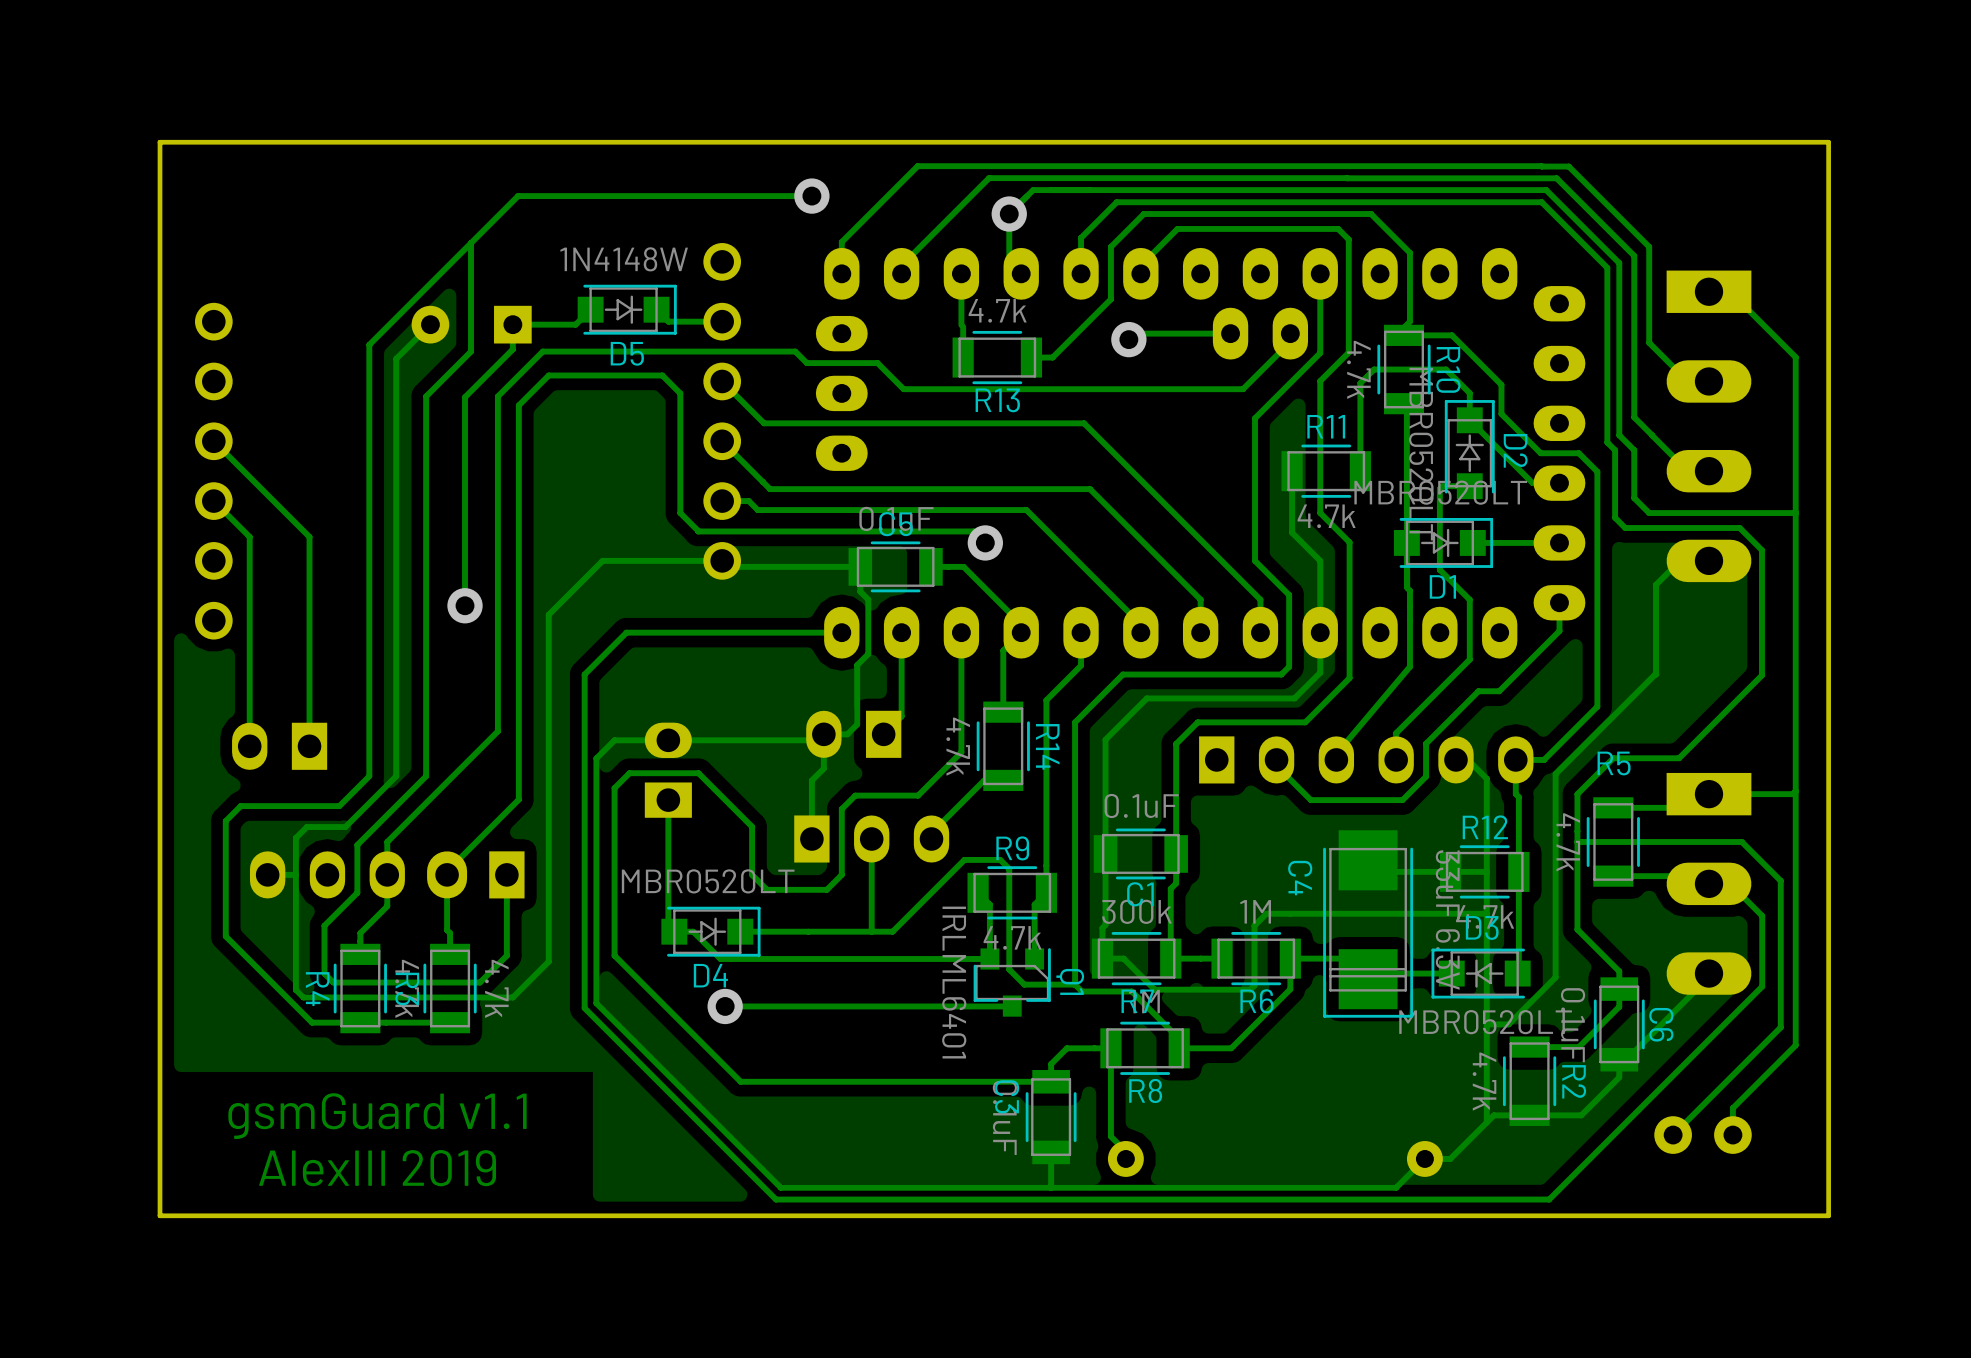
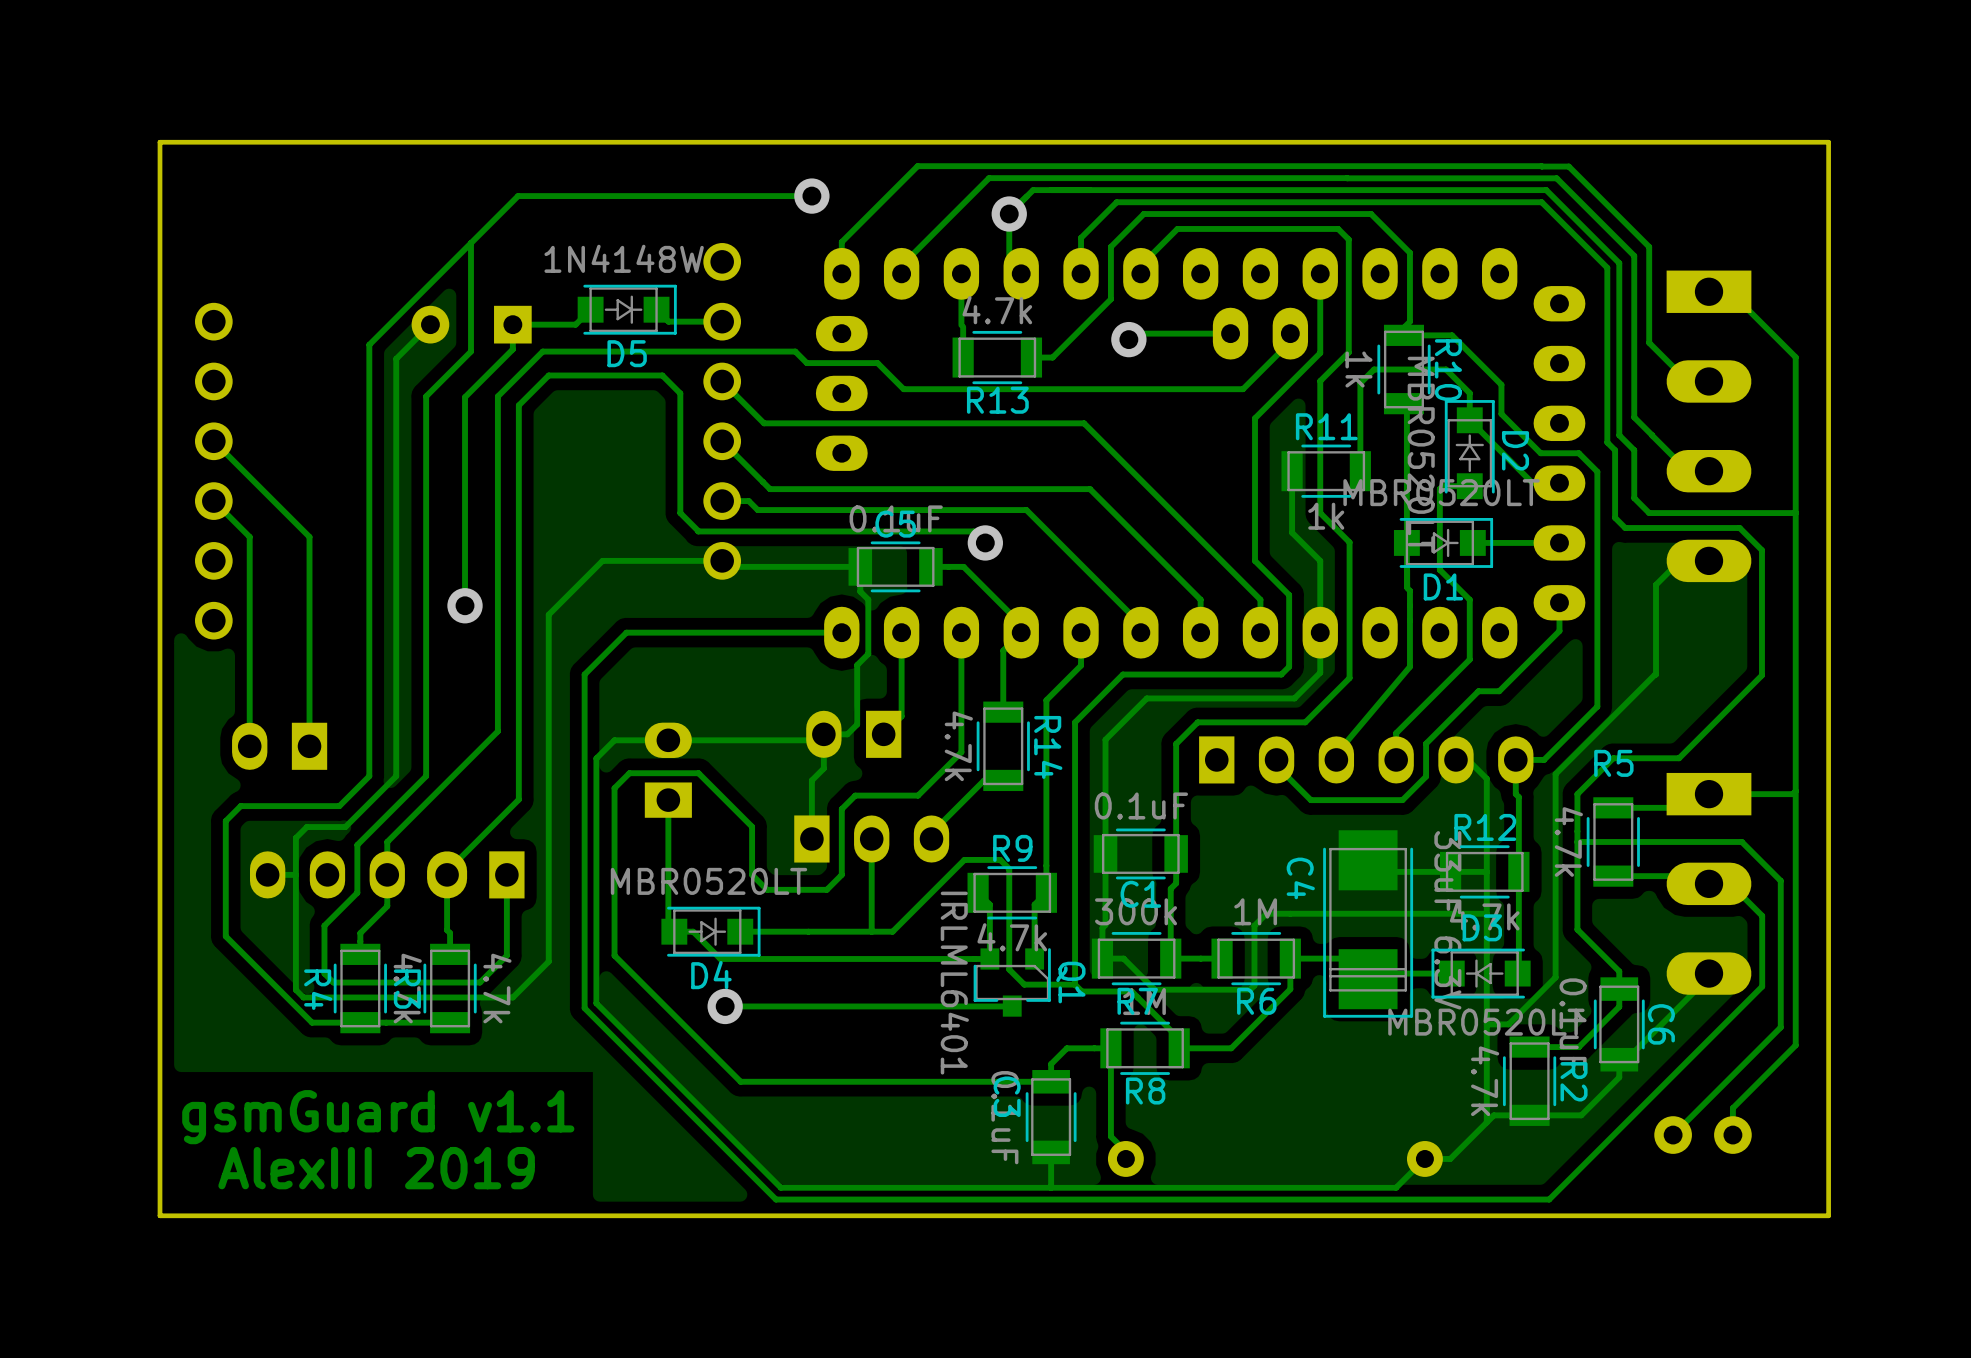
R10 value: 4.7k (1358, 369) -> 1k (1358, 369)
R11 value: 4.7k (1326, 516) -> 1k (1326, 516)

